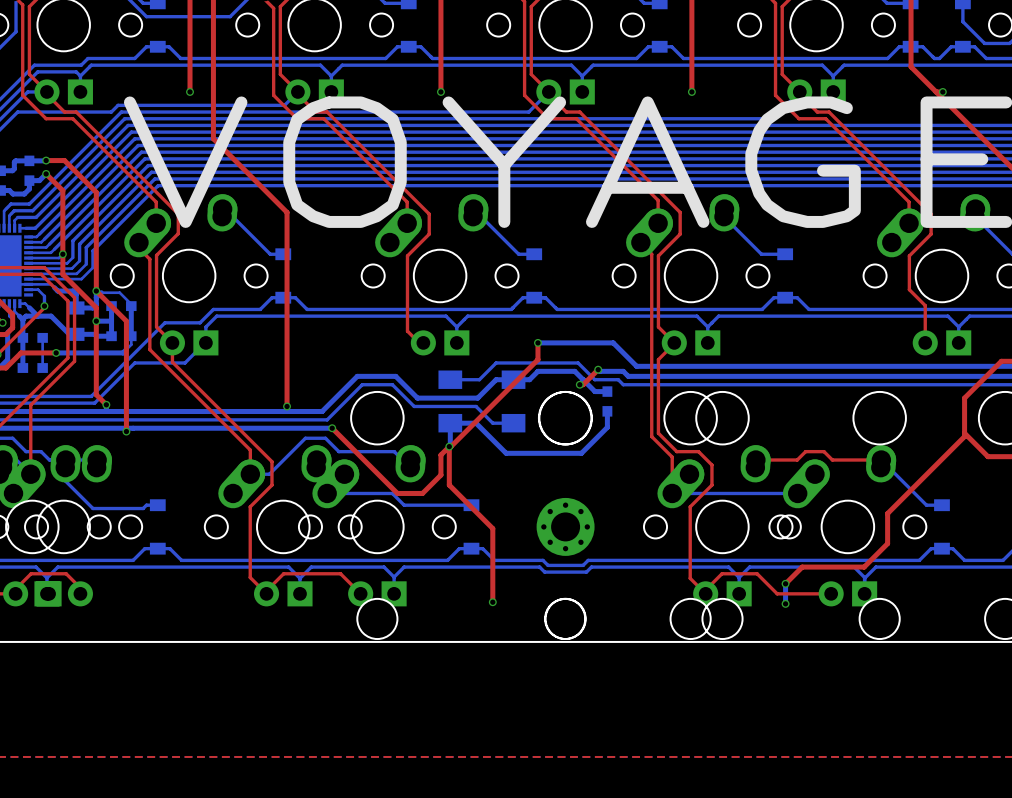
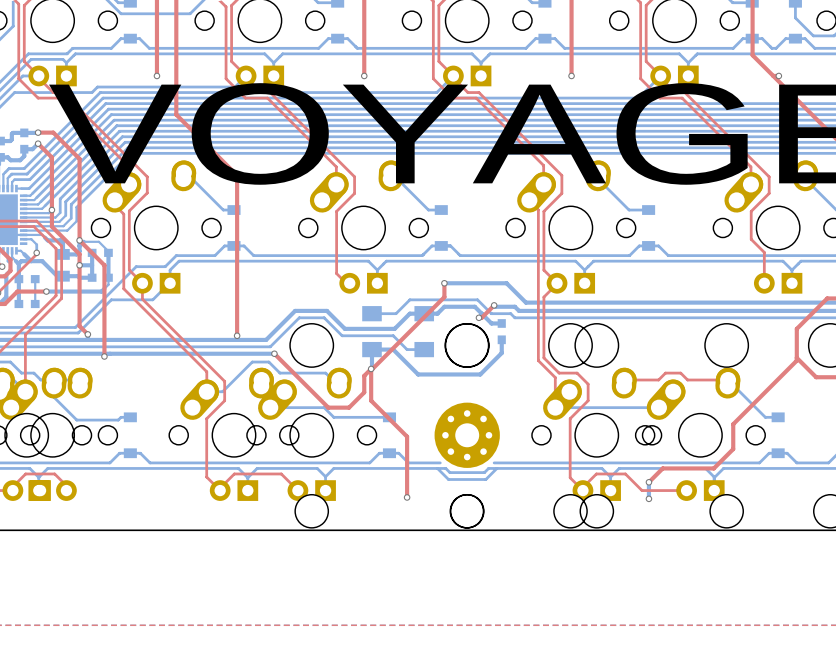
part footprint: [536, 497, 595, 556] -> [434, 402, 500, 468]
bottom track: (532, 560) (542, 560) (548, 565) (583, 565) (588, 560) (598, 560) -> none
bottom track: none -> (437, 468) (448, 479) (485, 479) (496, 468)

